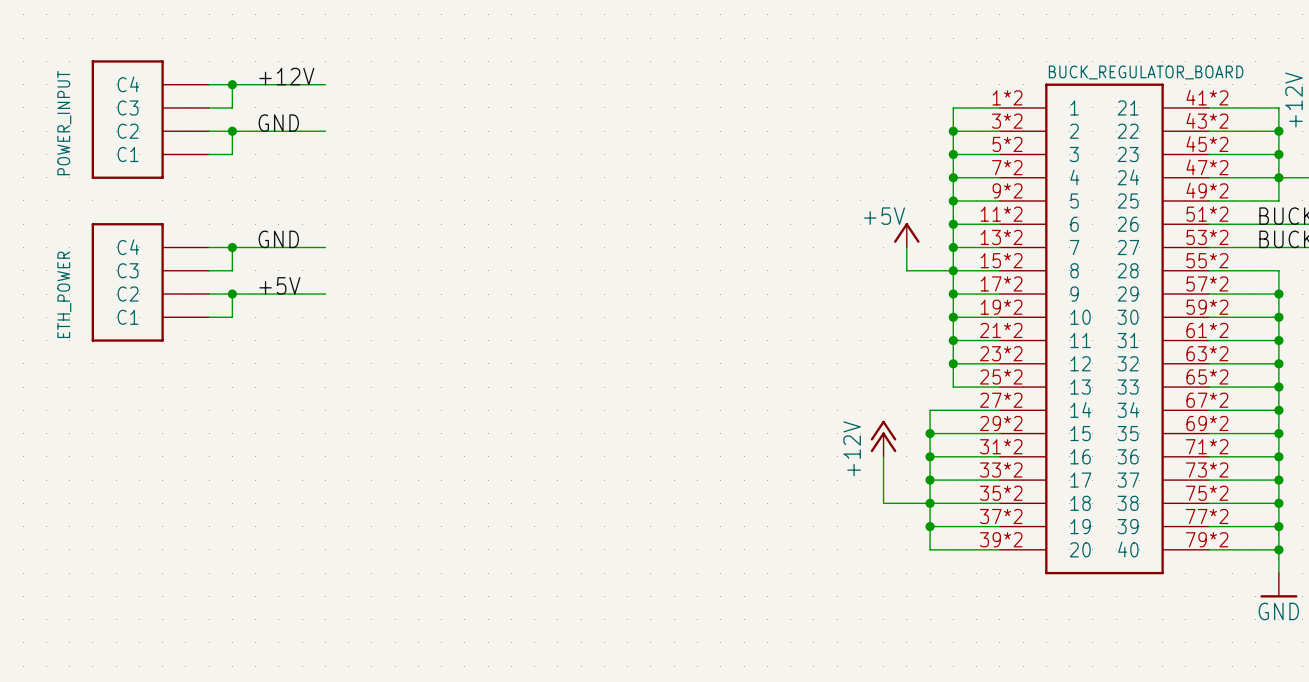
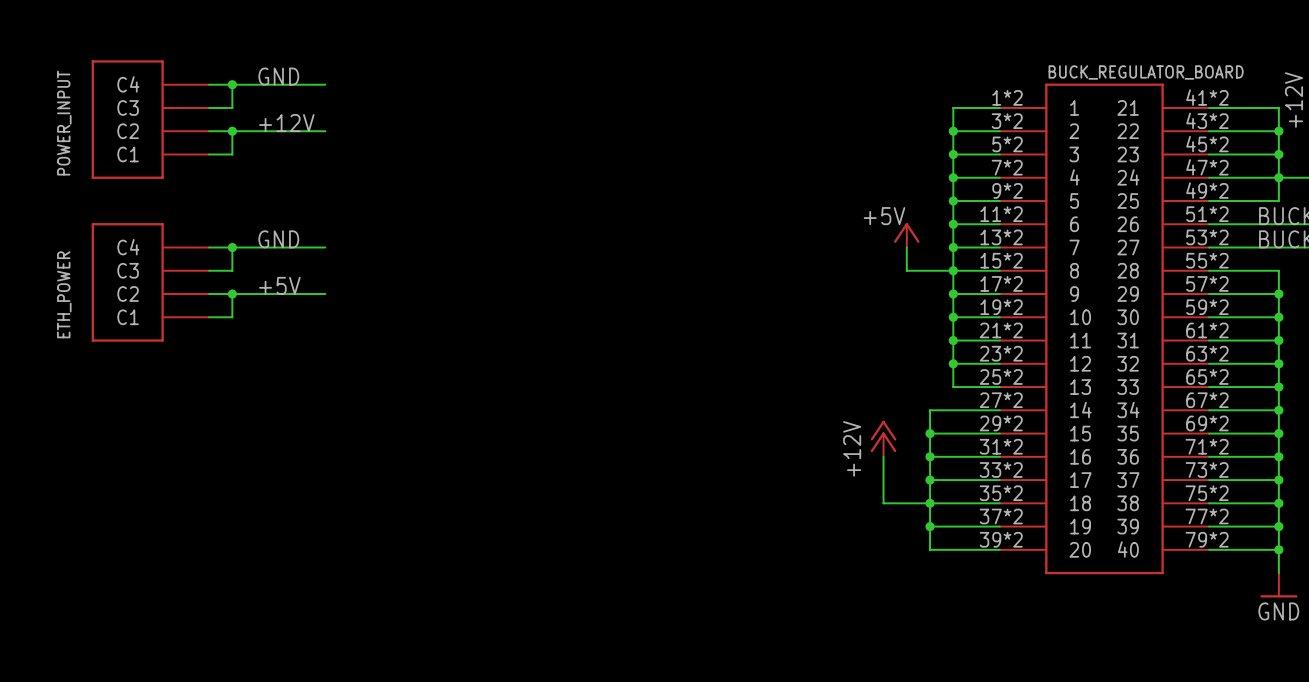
label: +12V (286, 76) -> GND (278, 76)
label: GND (278, 123) -> +12V (286, 123)

